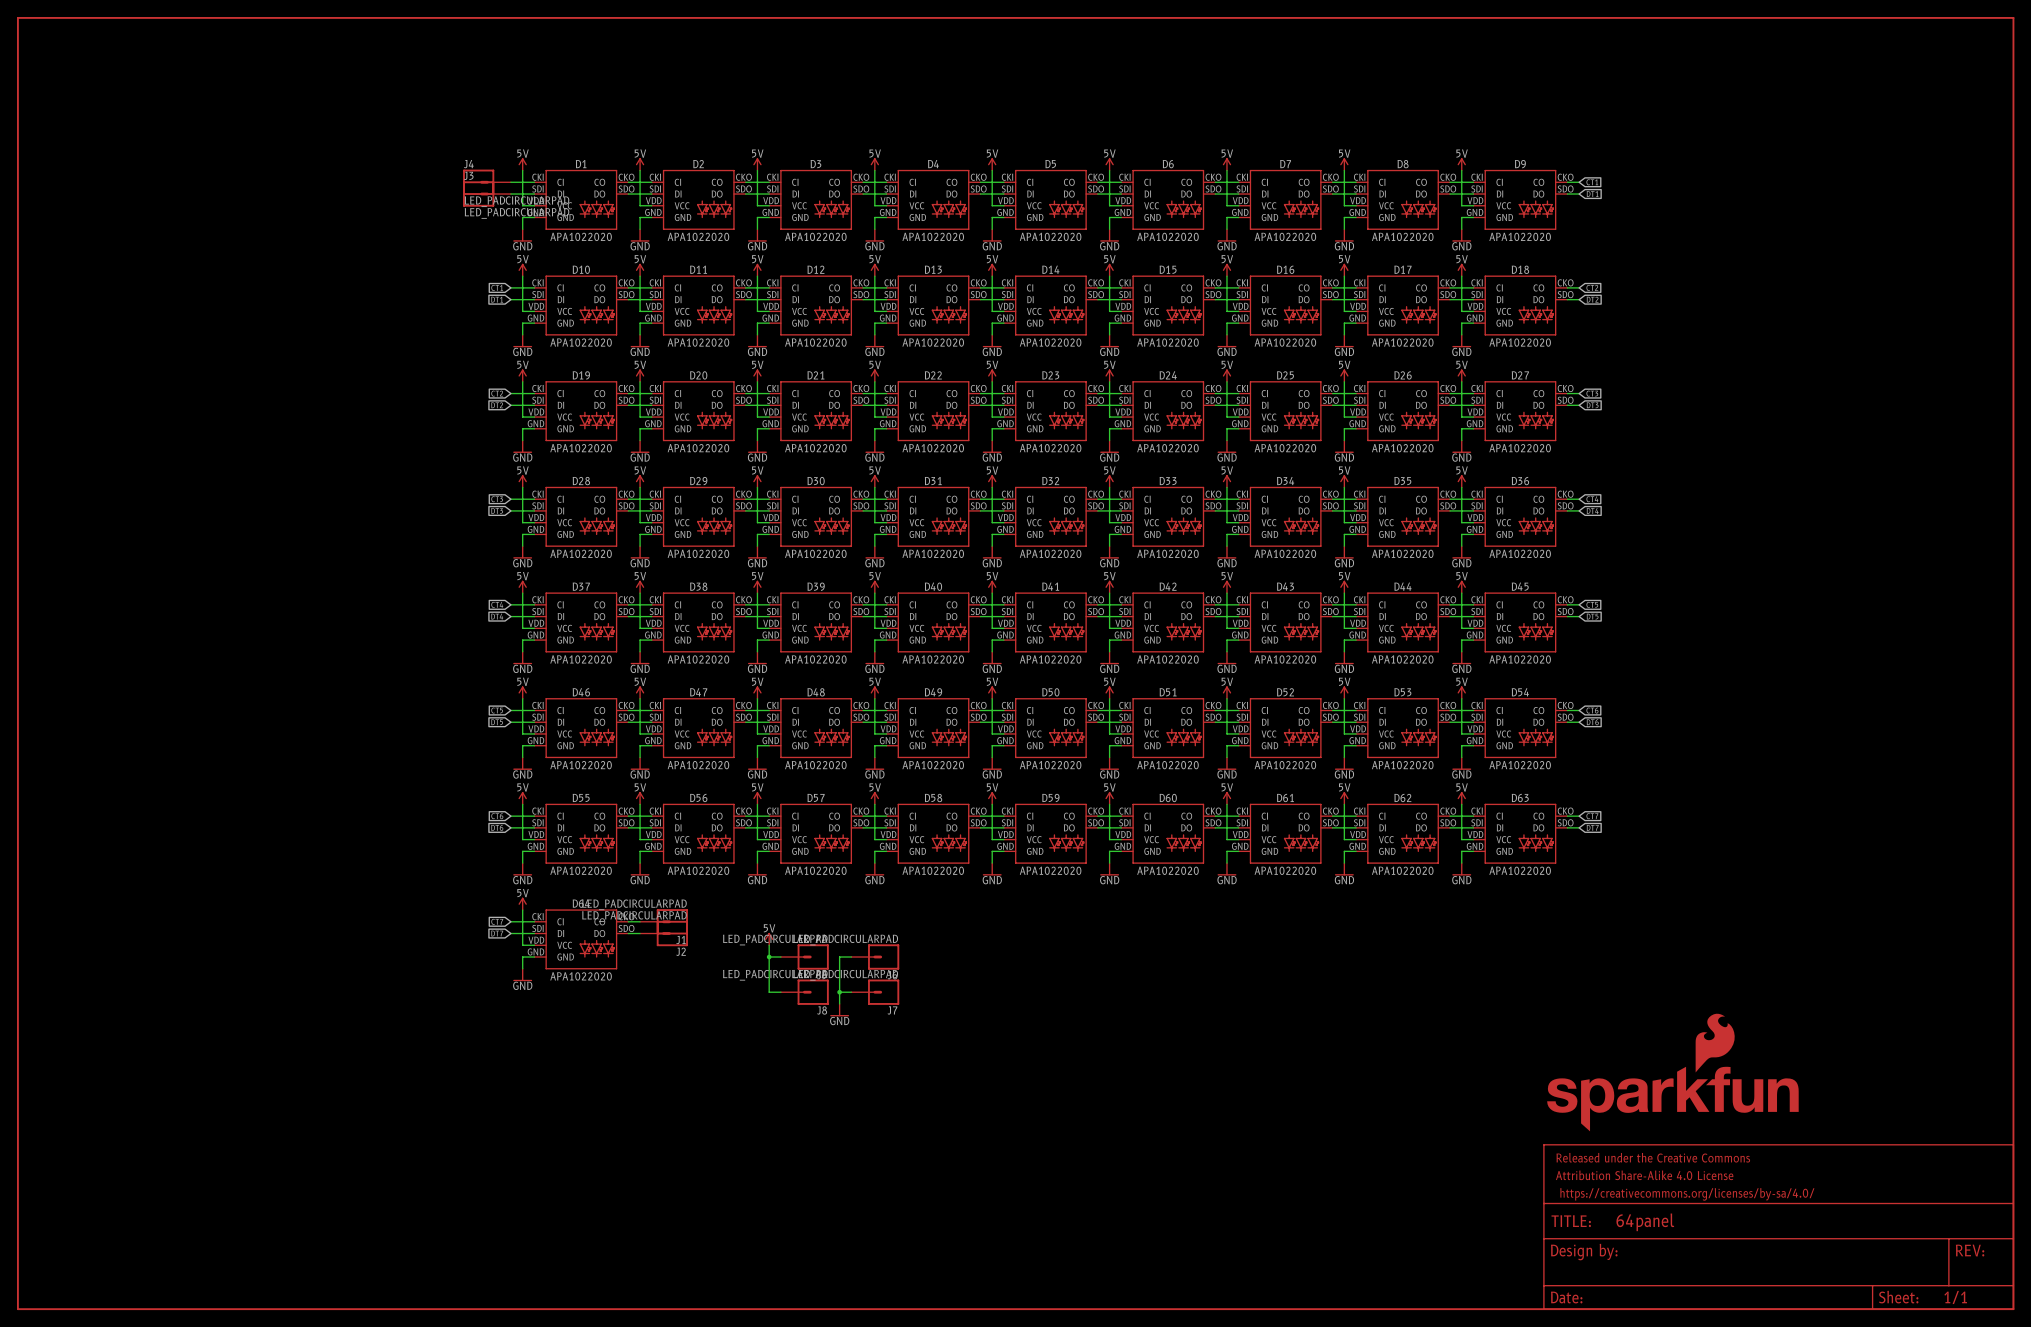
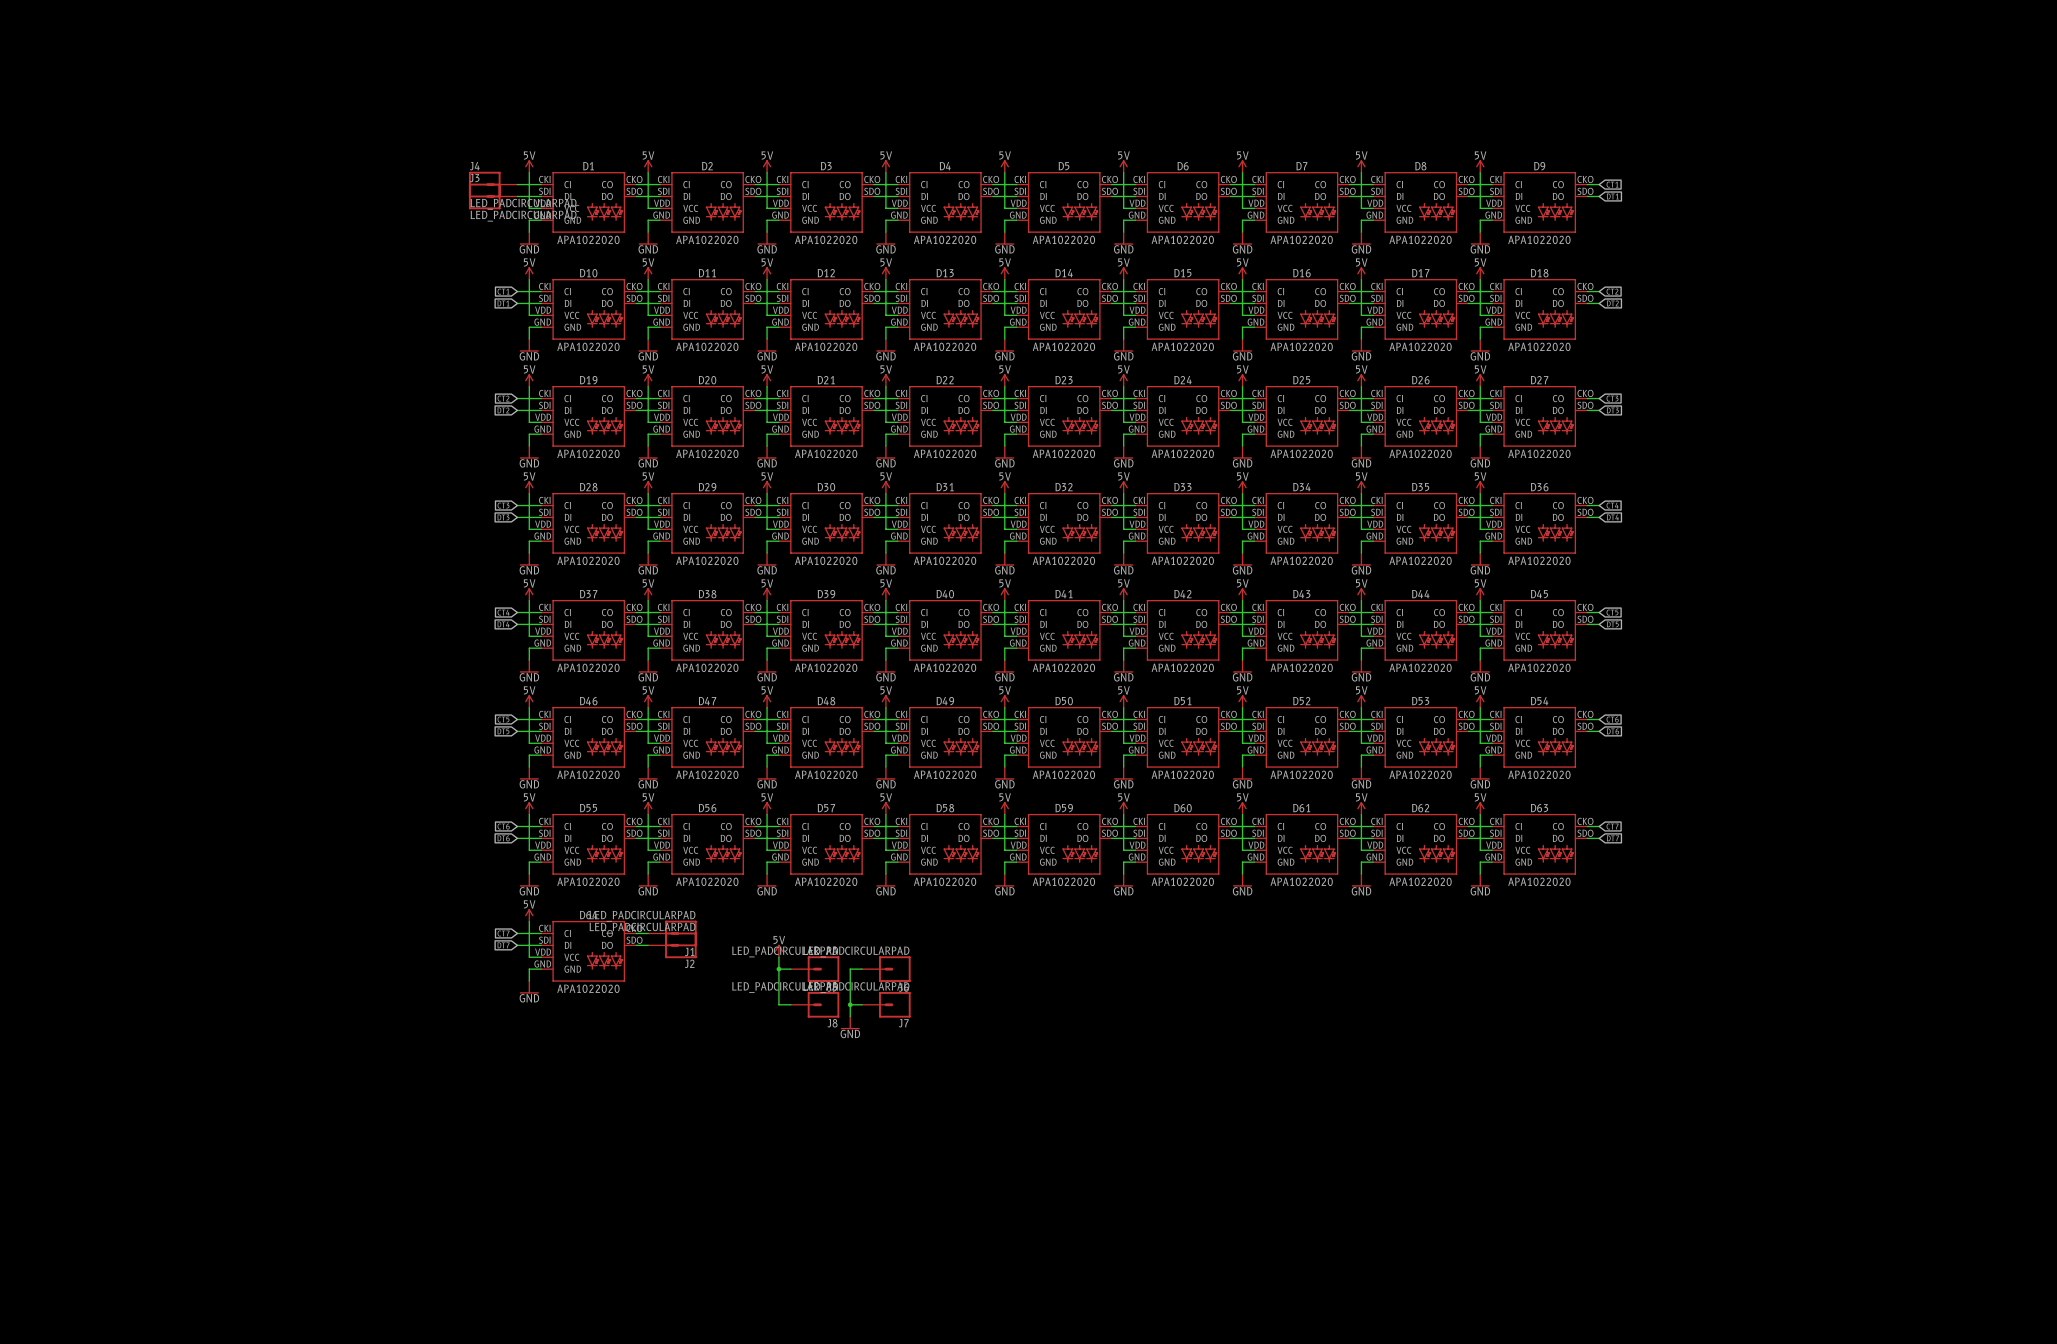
part: (1015, 663) -> none
part: (1672, 1072) -> none
part: (1778, 1226) -> none

